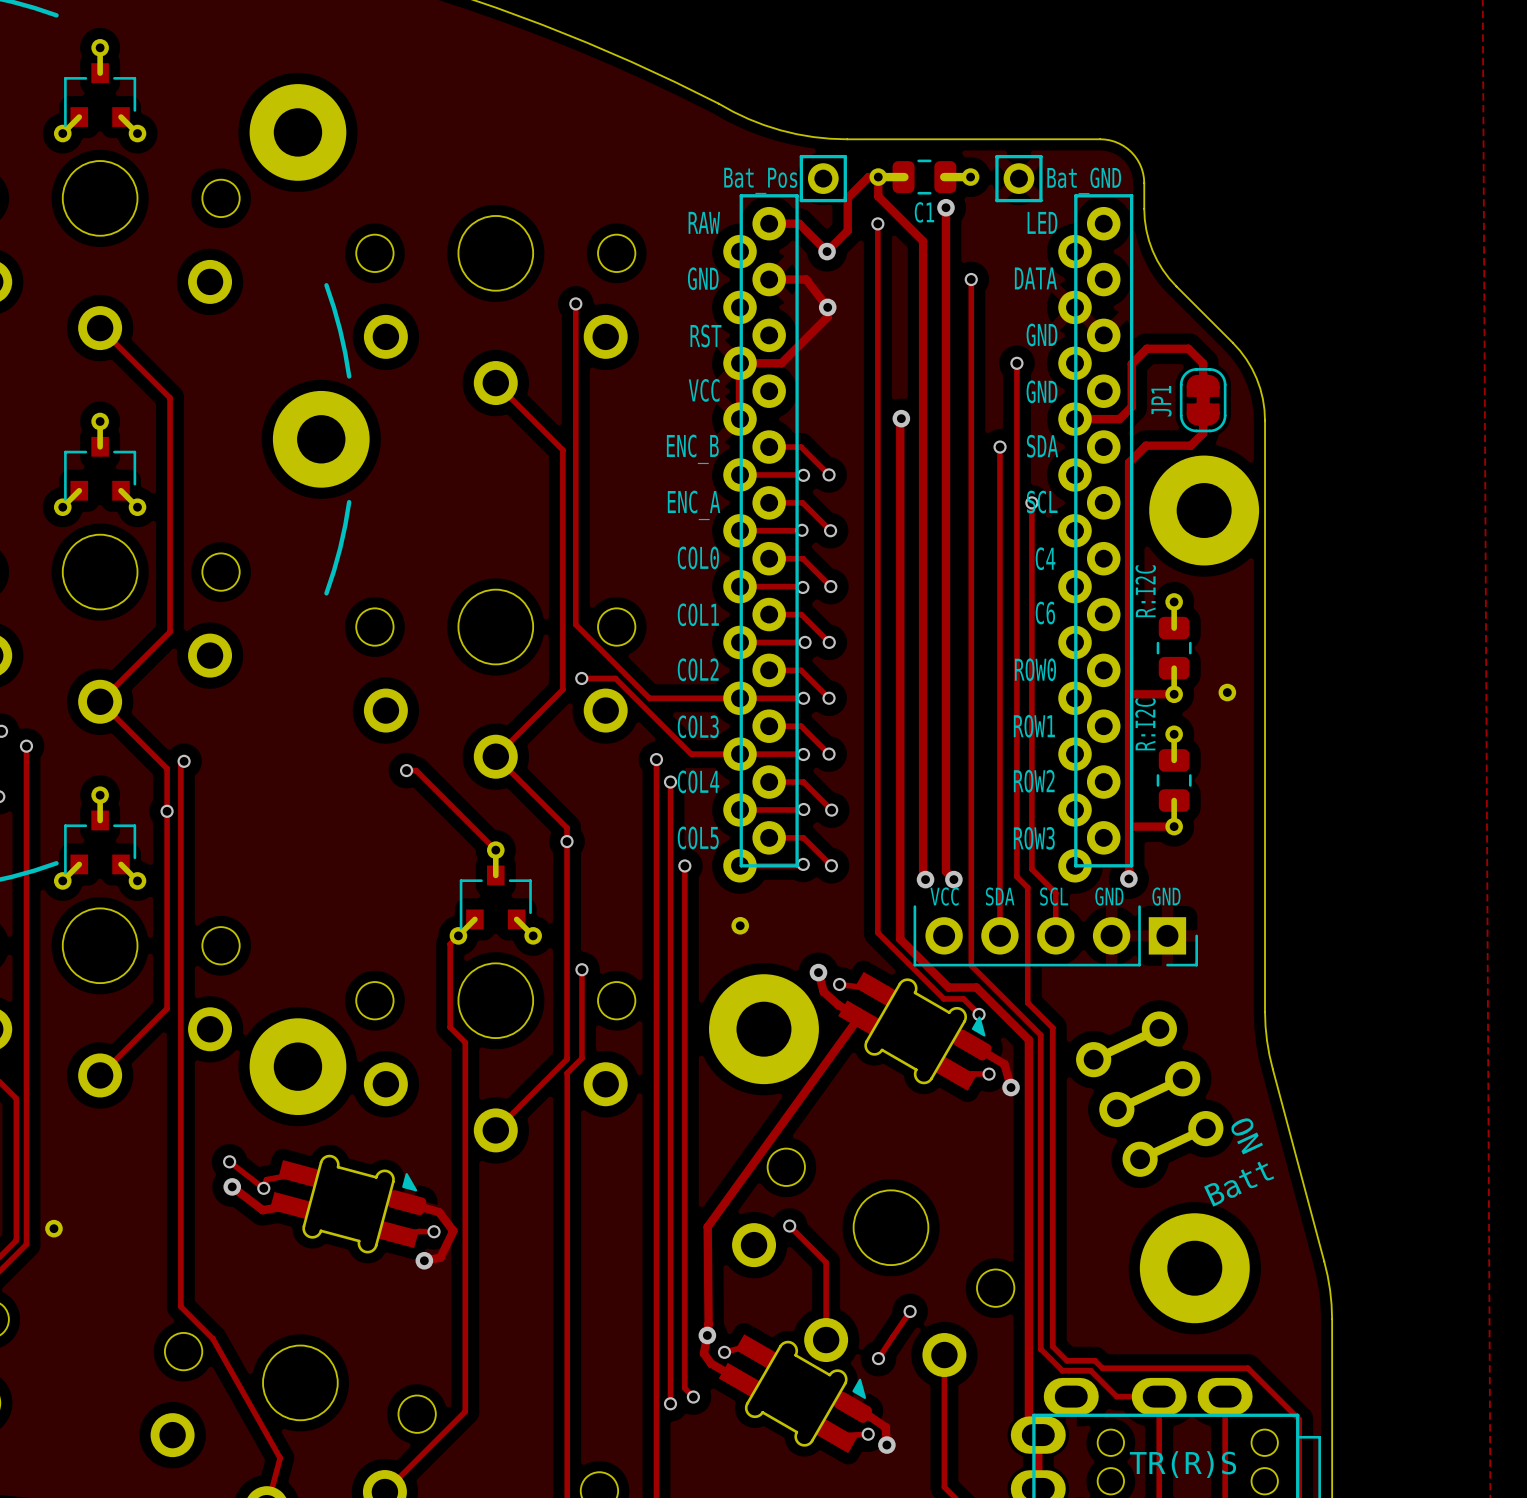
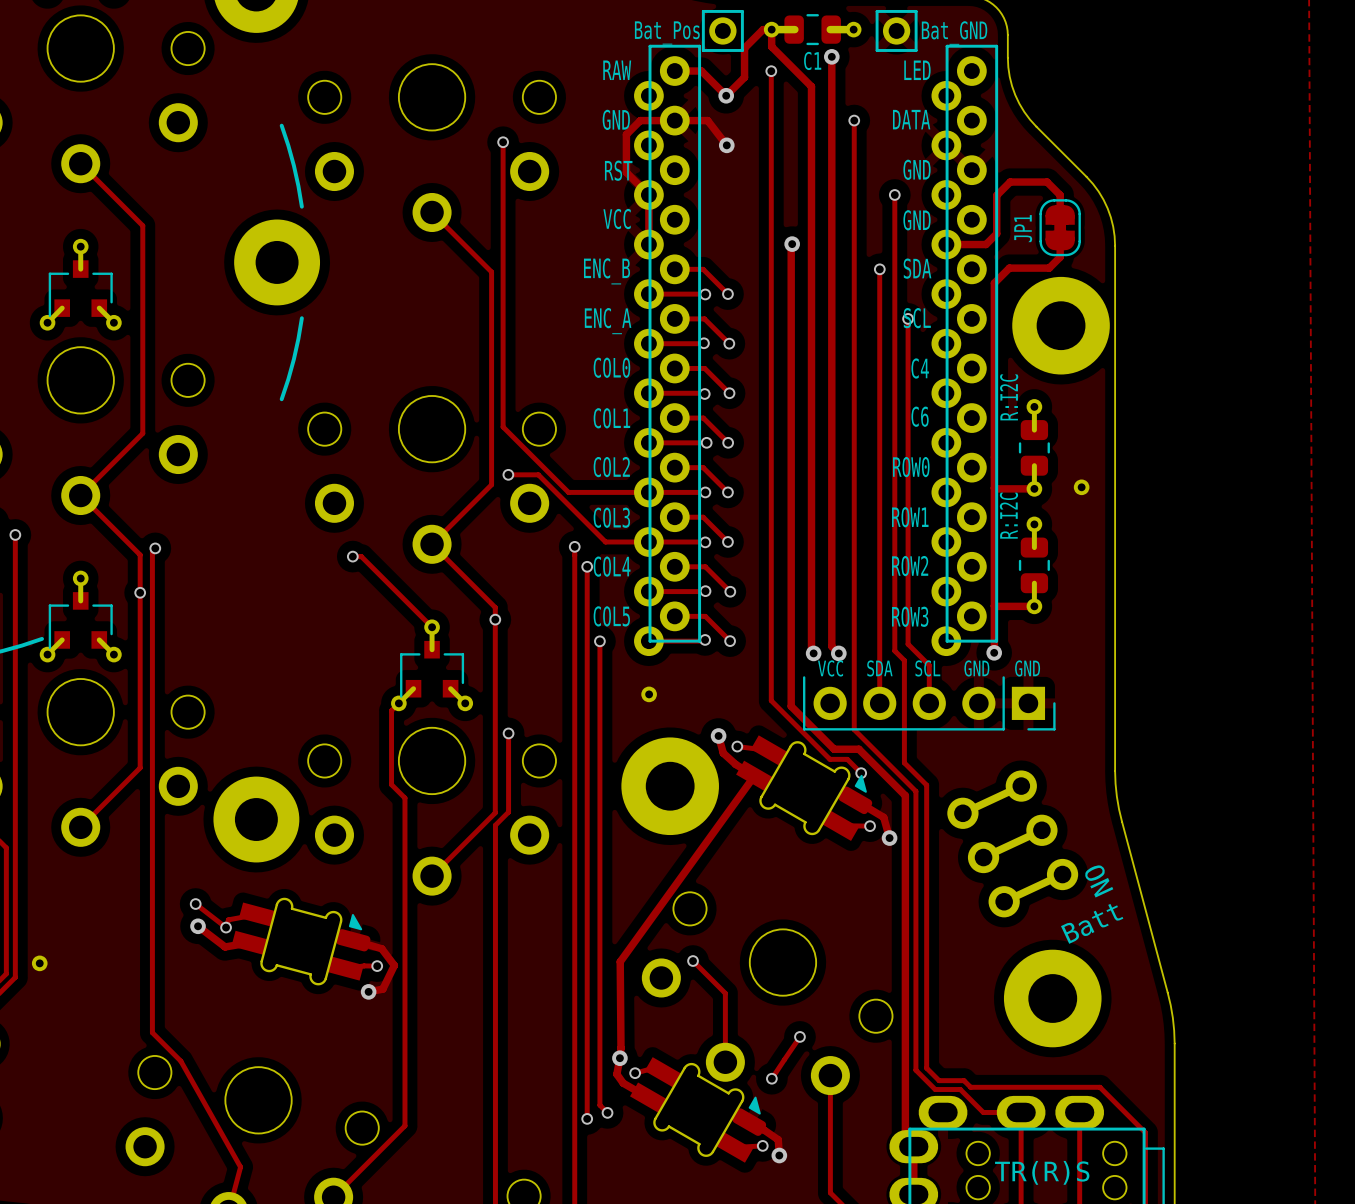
track: (827, 307) (827, 317) (781, 363) (740, 363) -> (674, 120) (640, 120) (626, 134) (626, 172) (648, 194)

